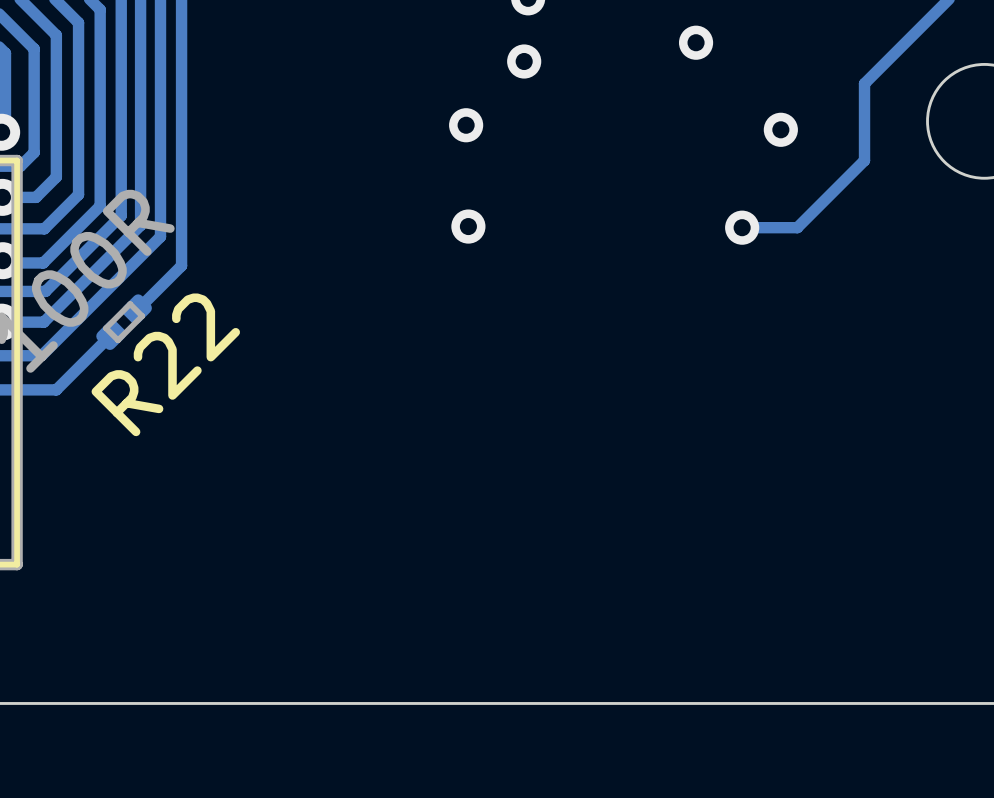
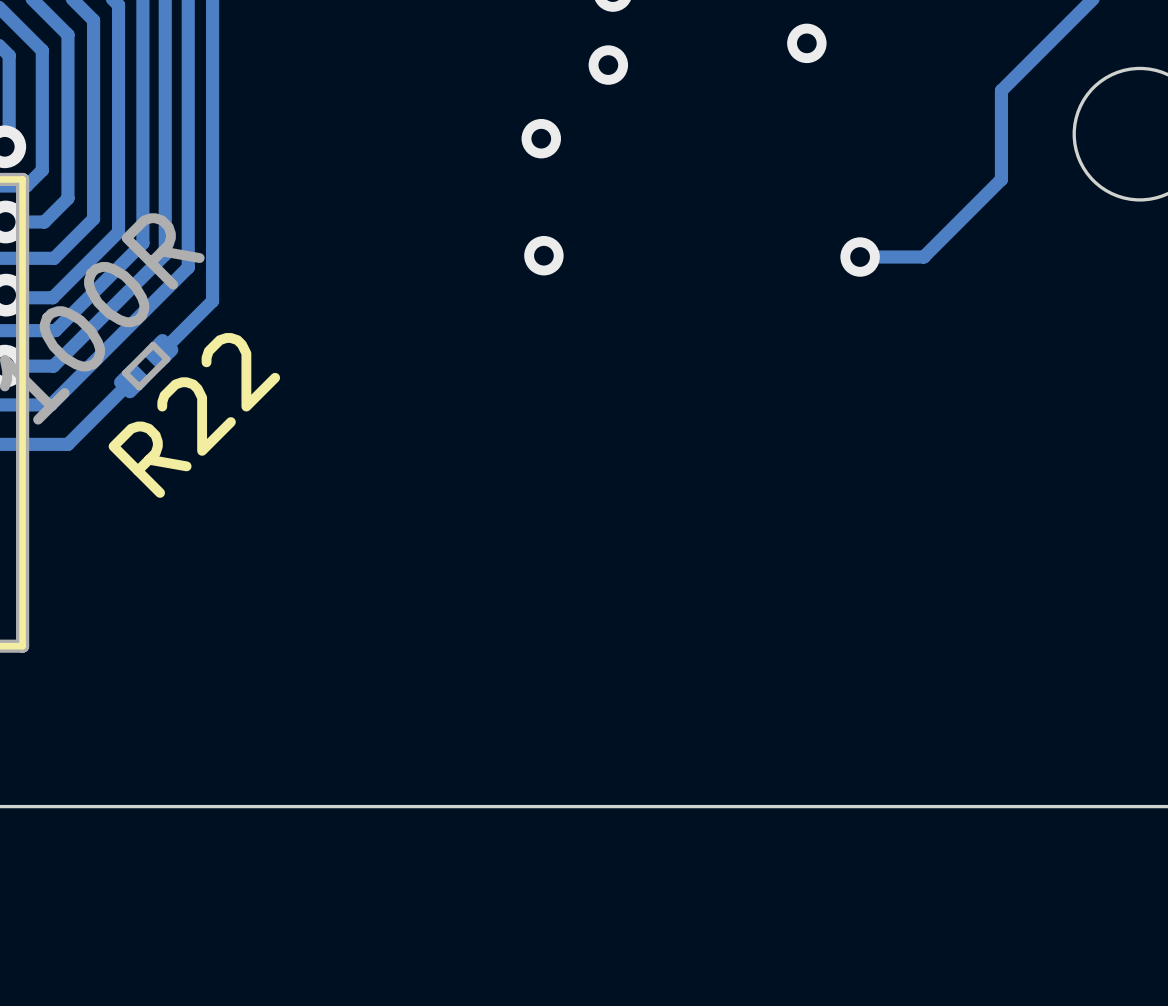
via: (780, 129) -> none

